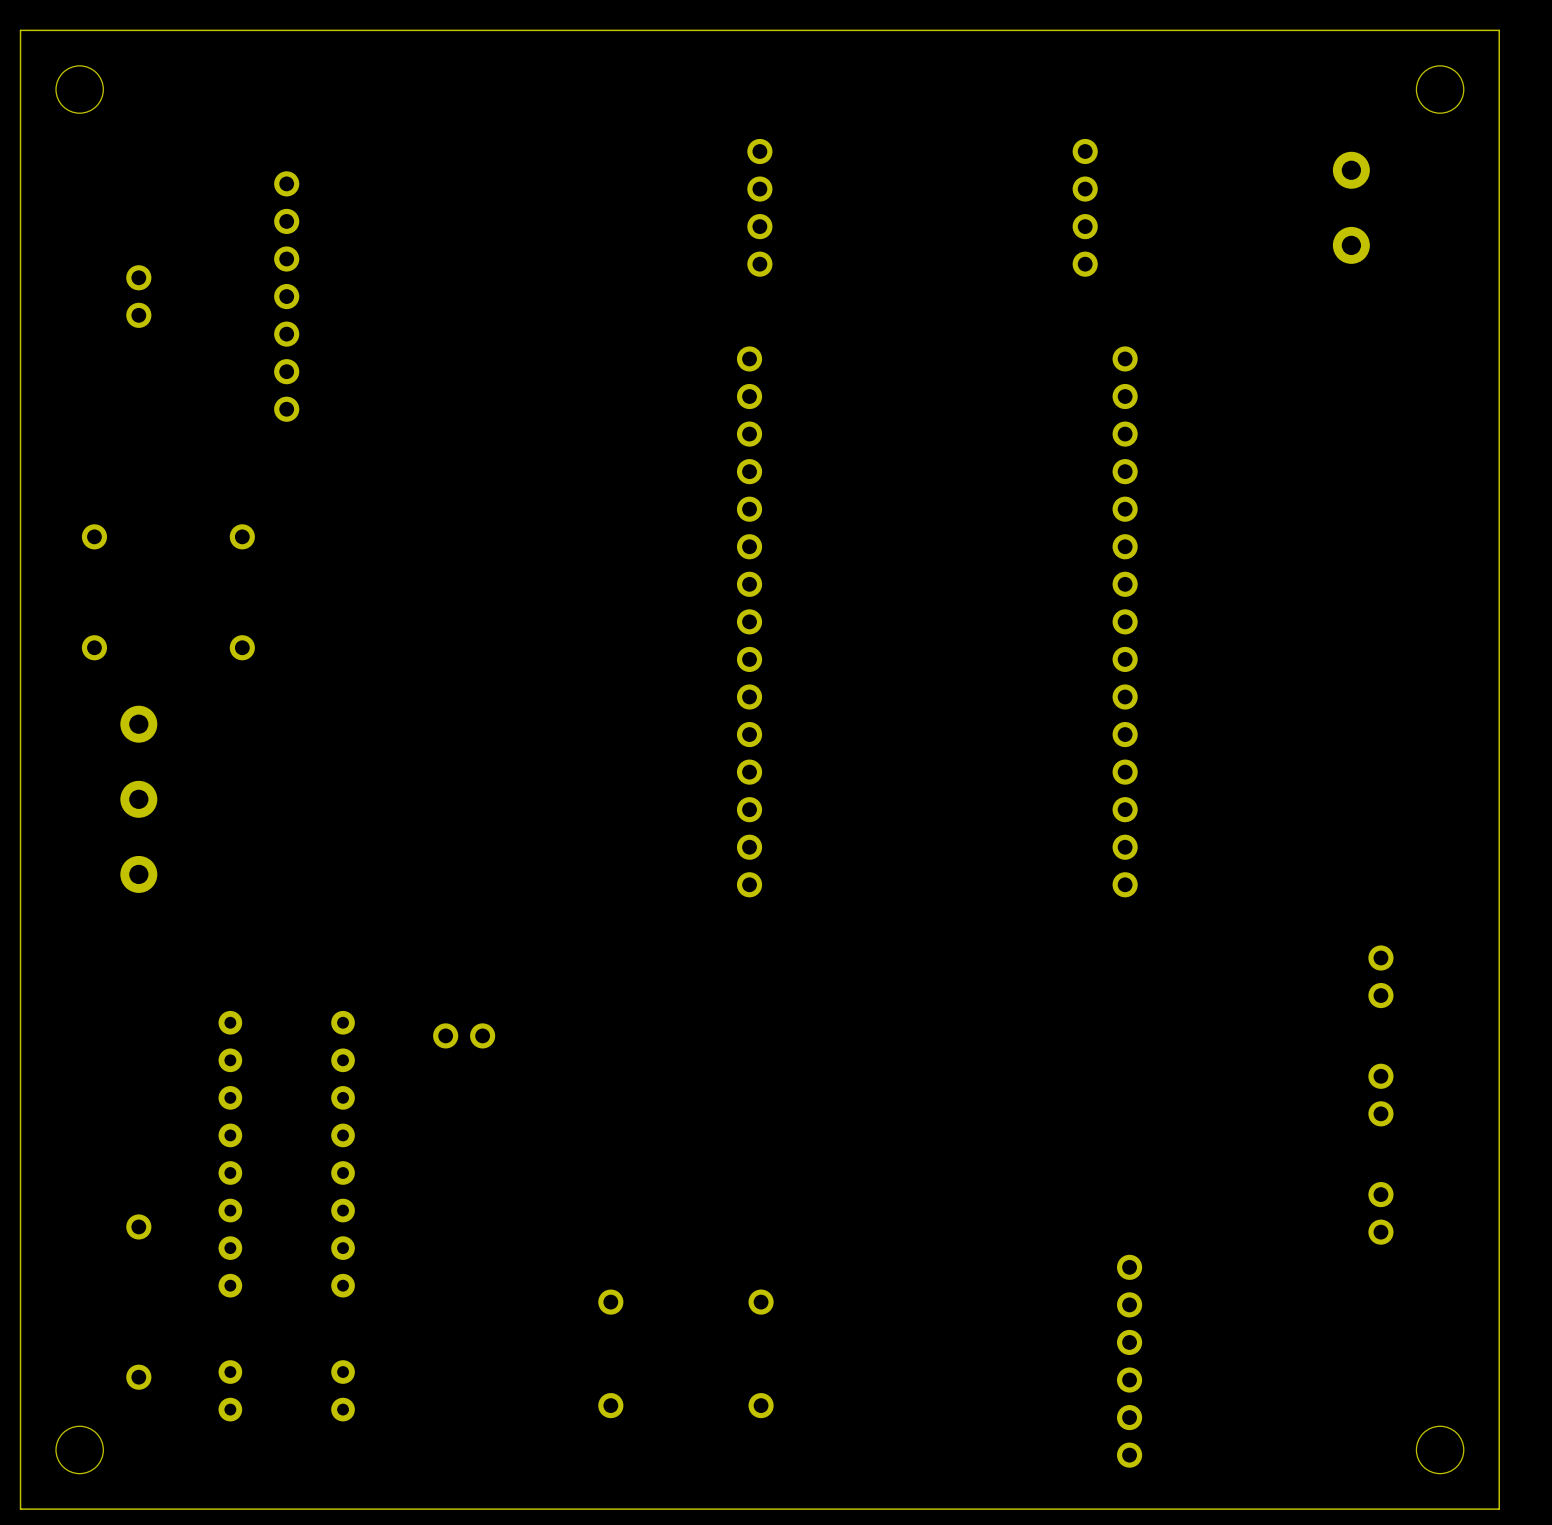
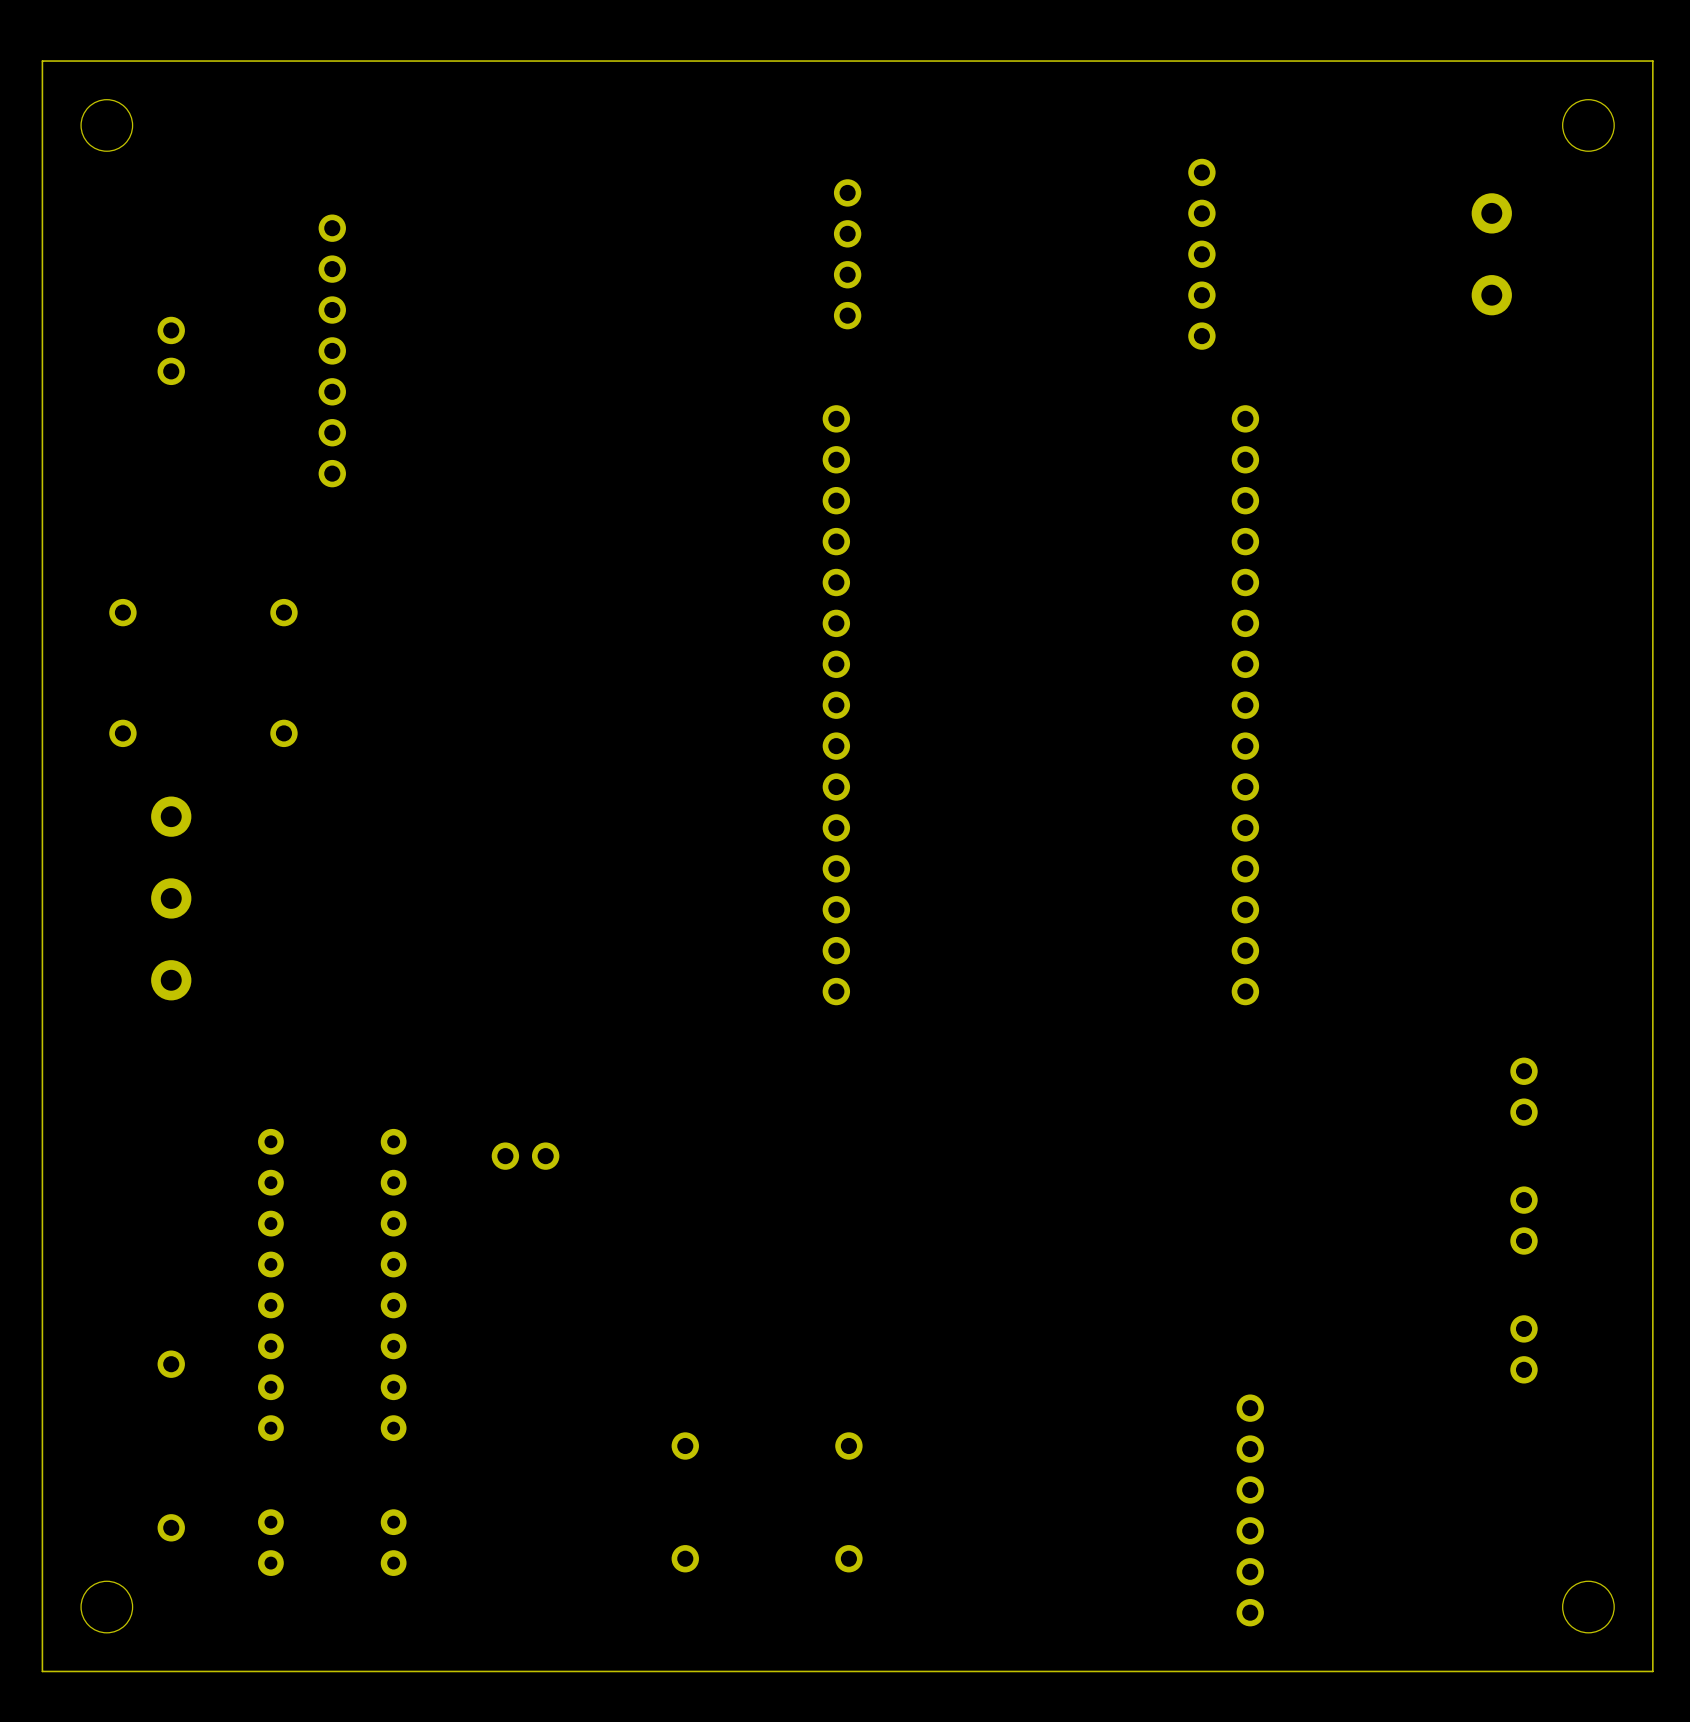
part footprint: [1072, 138, 1098, 277] -> [1188, 158, 1216, 350]

